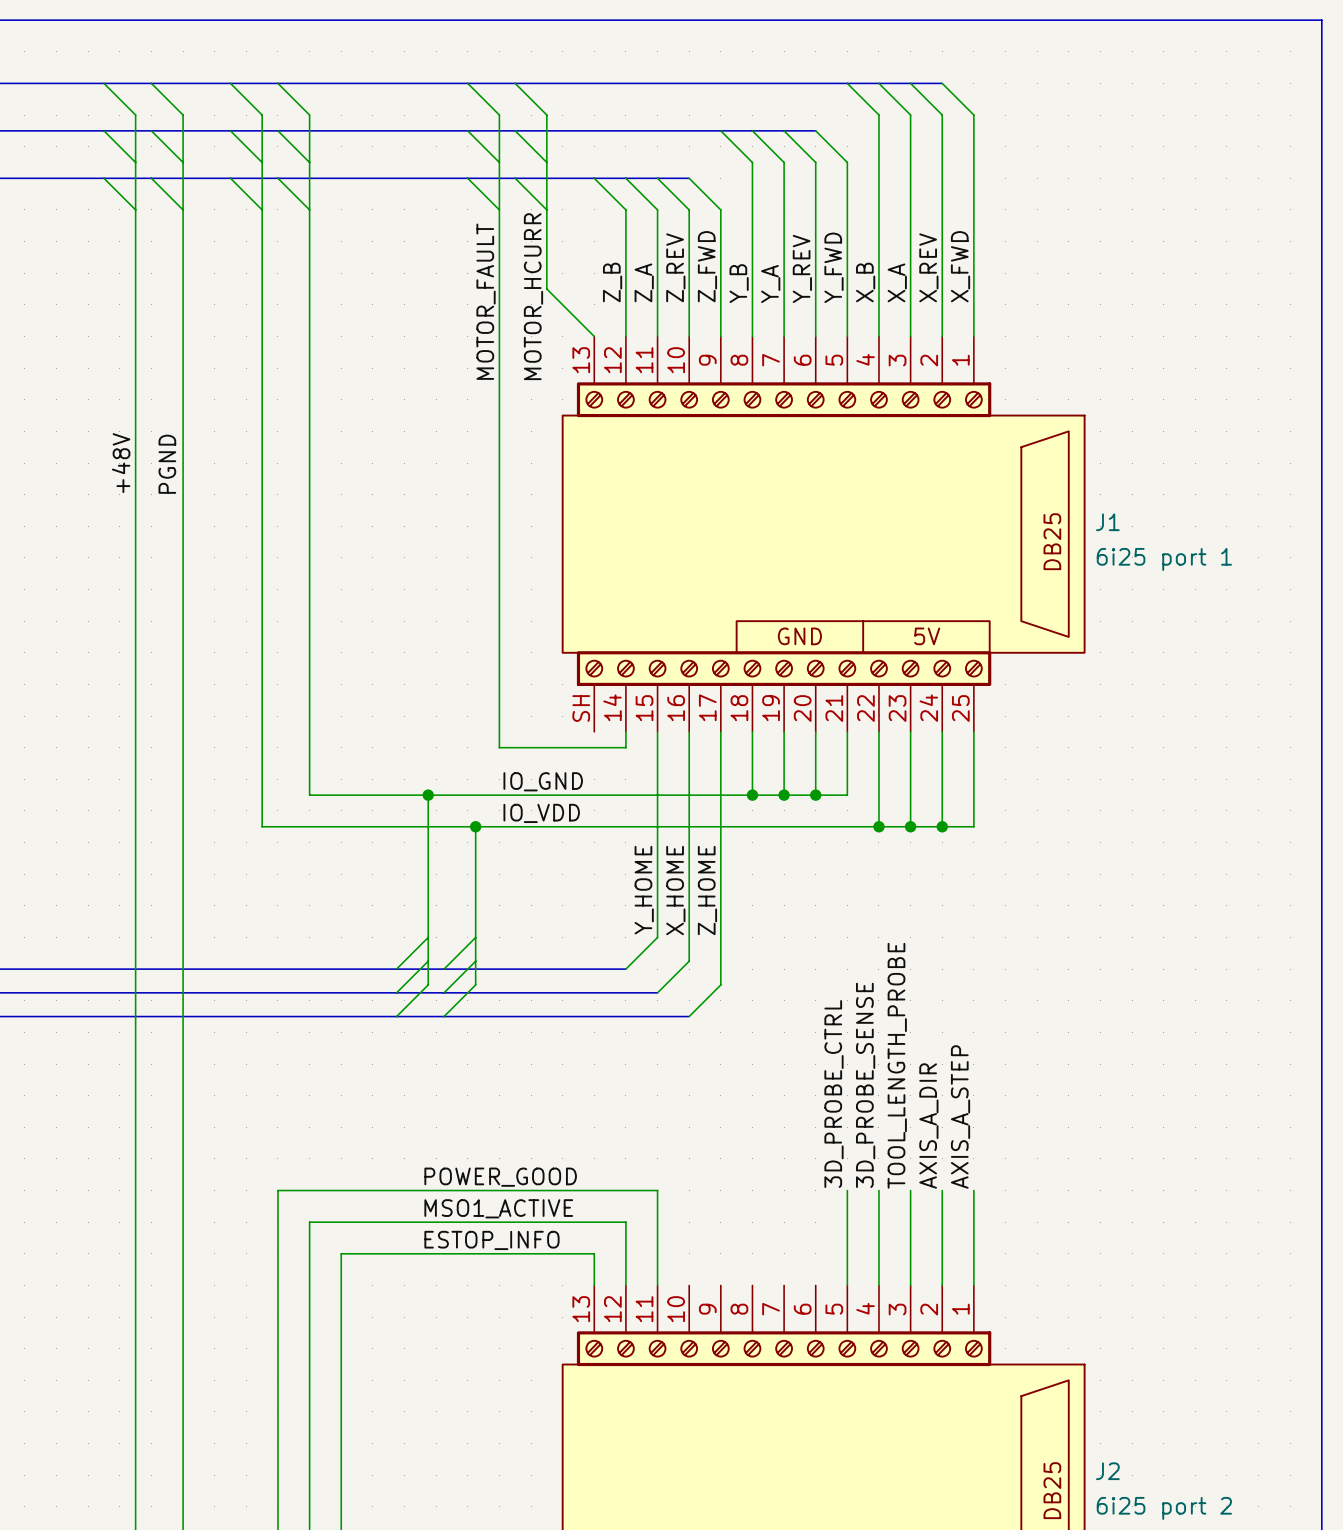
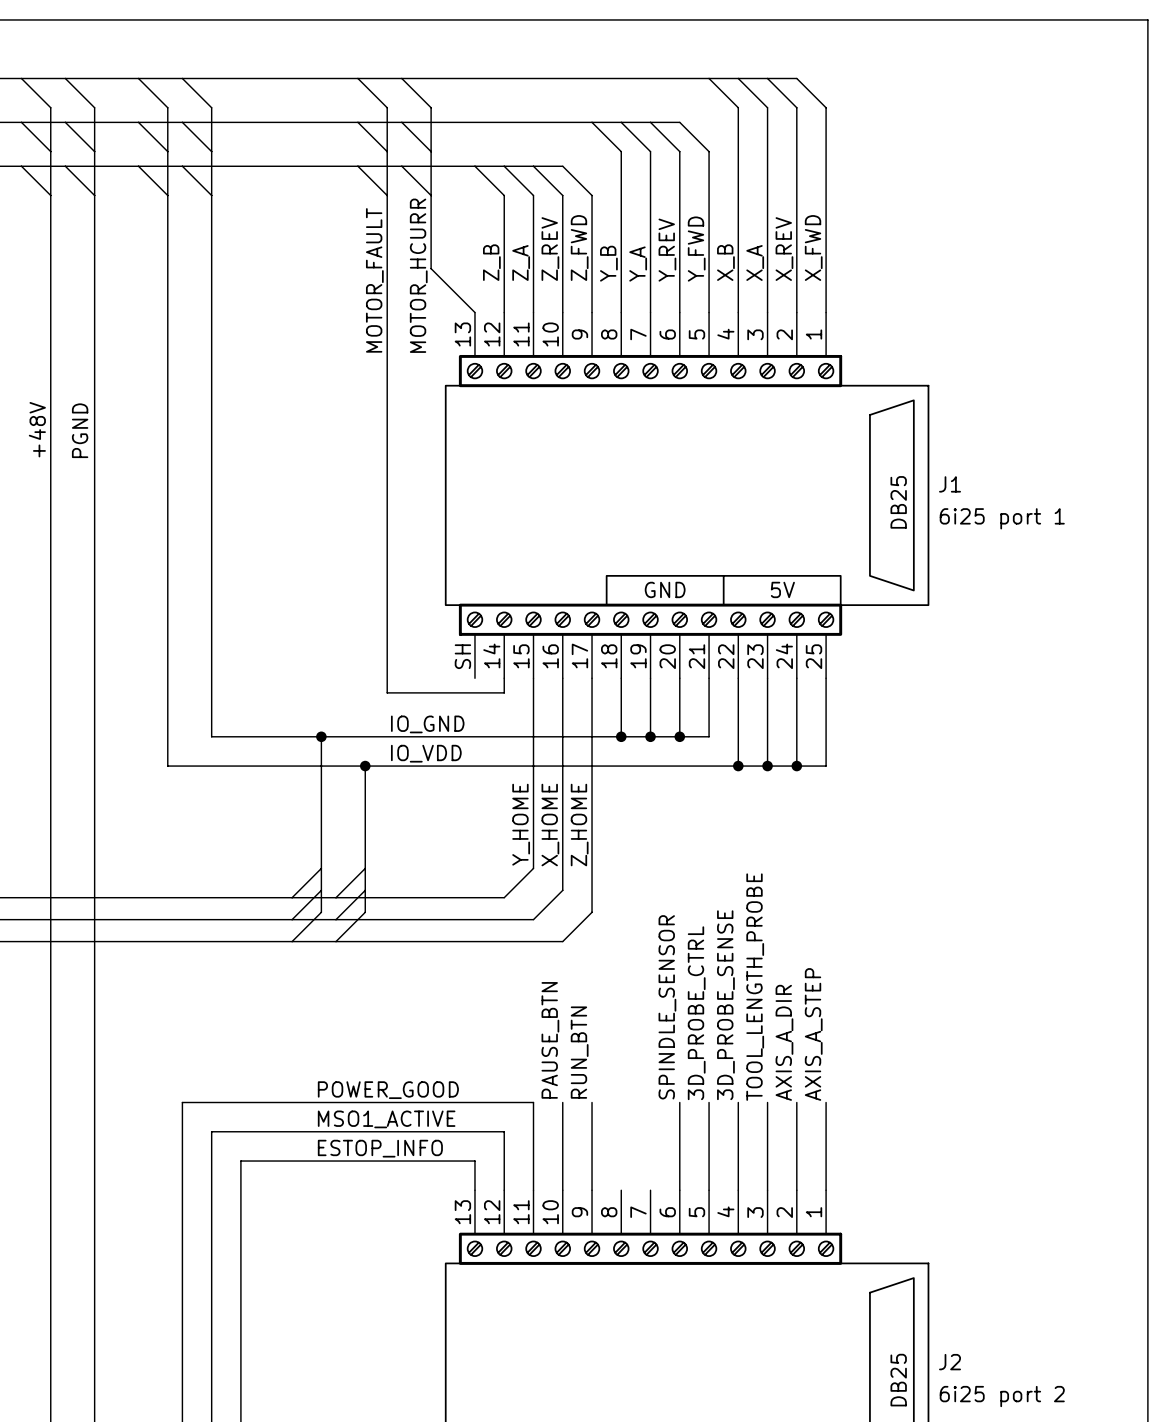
label: none -> SPINDLE_SENSOR (667, 1007)
label: none -> PAUSE_BTN (550, 1040)
label: none -> RUN_BTN (579, 1052)
wire: none -> (562, 1102) (562, 1190)
wire: none -> (592, 1102) (592, 1190)
wire: none -> (679, 1102) (679, 1190)

